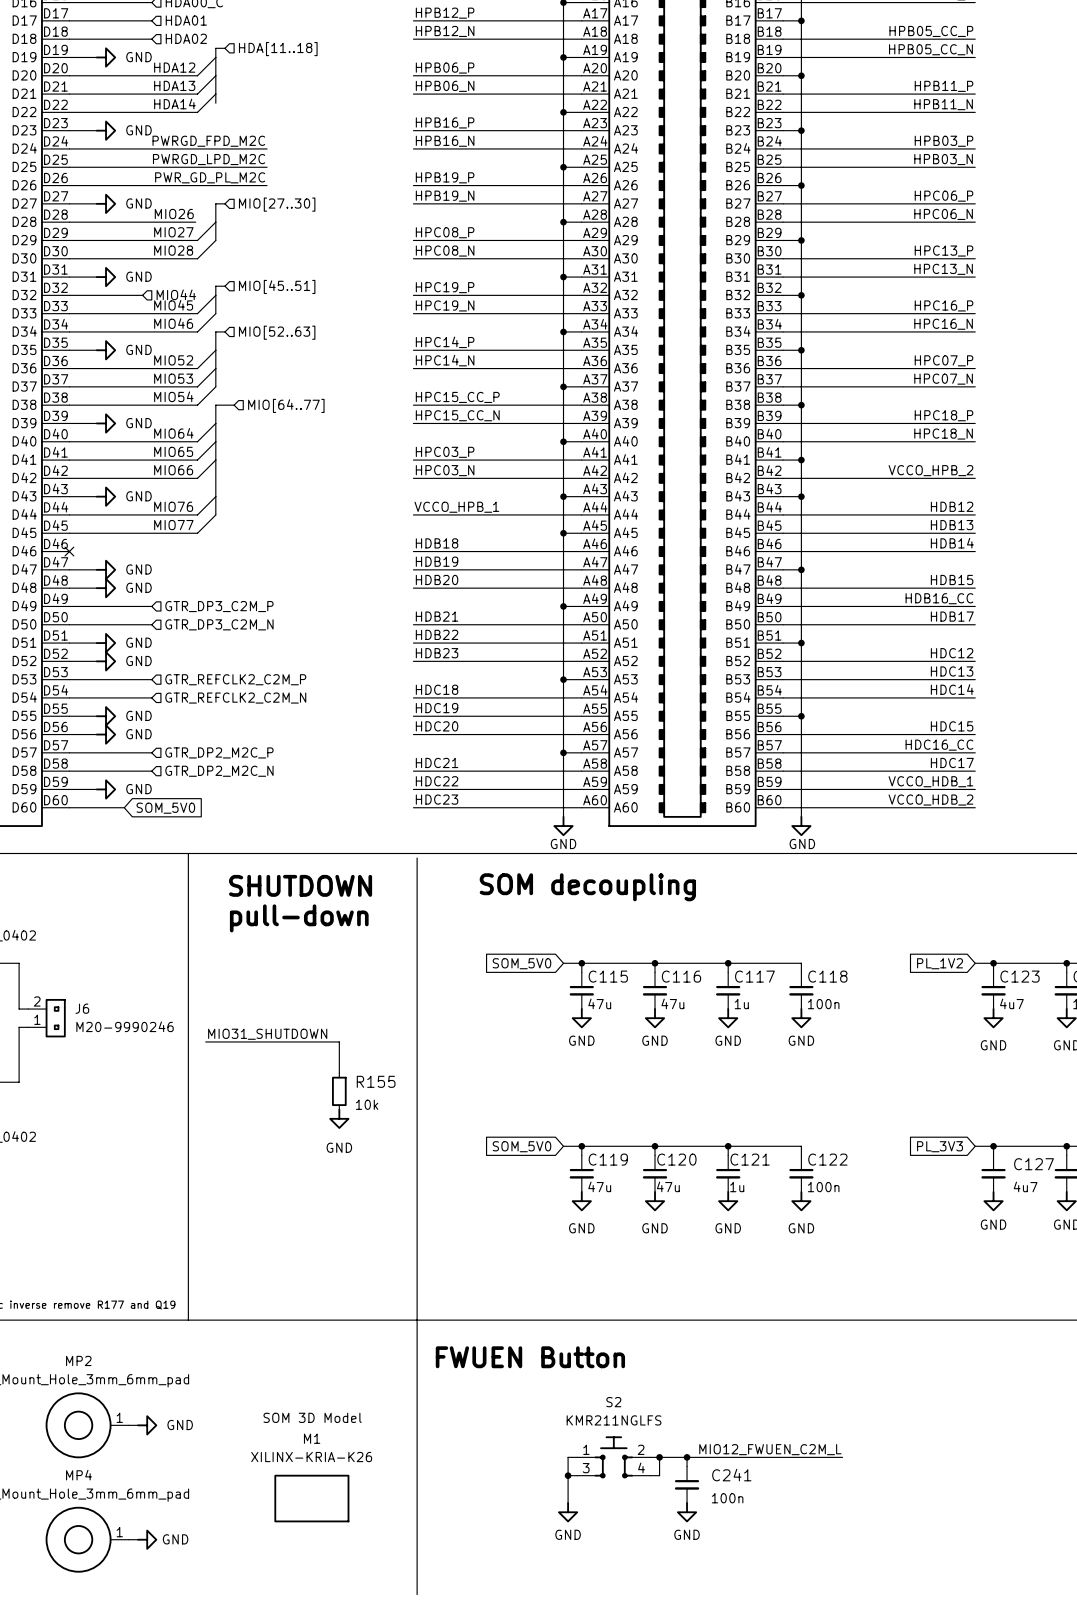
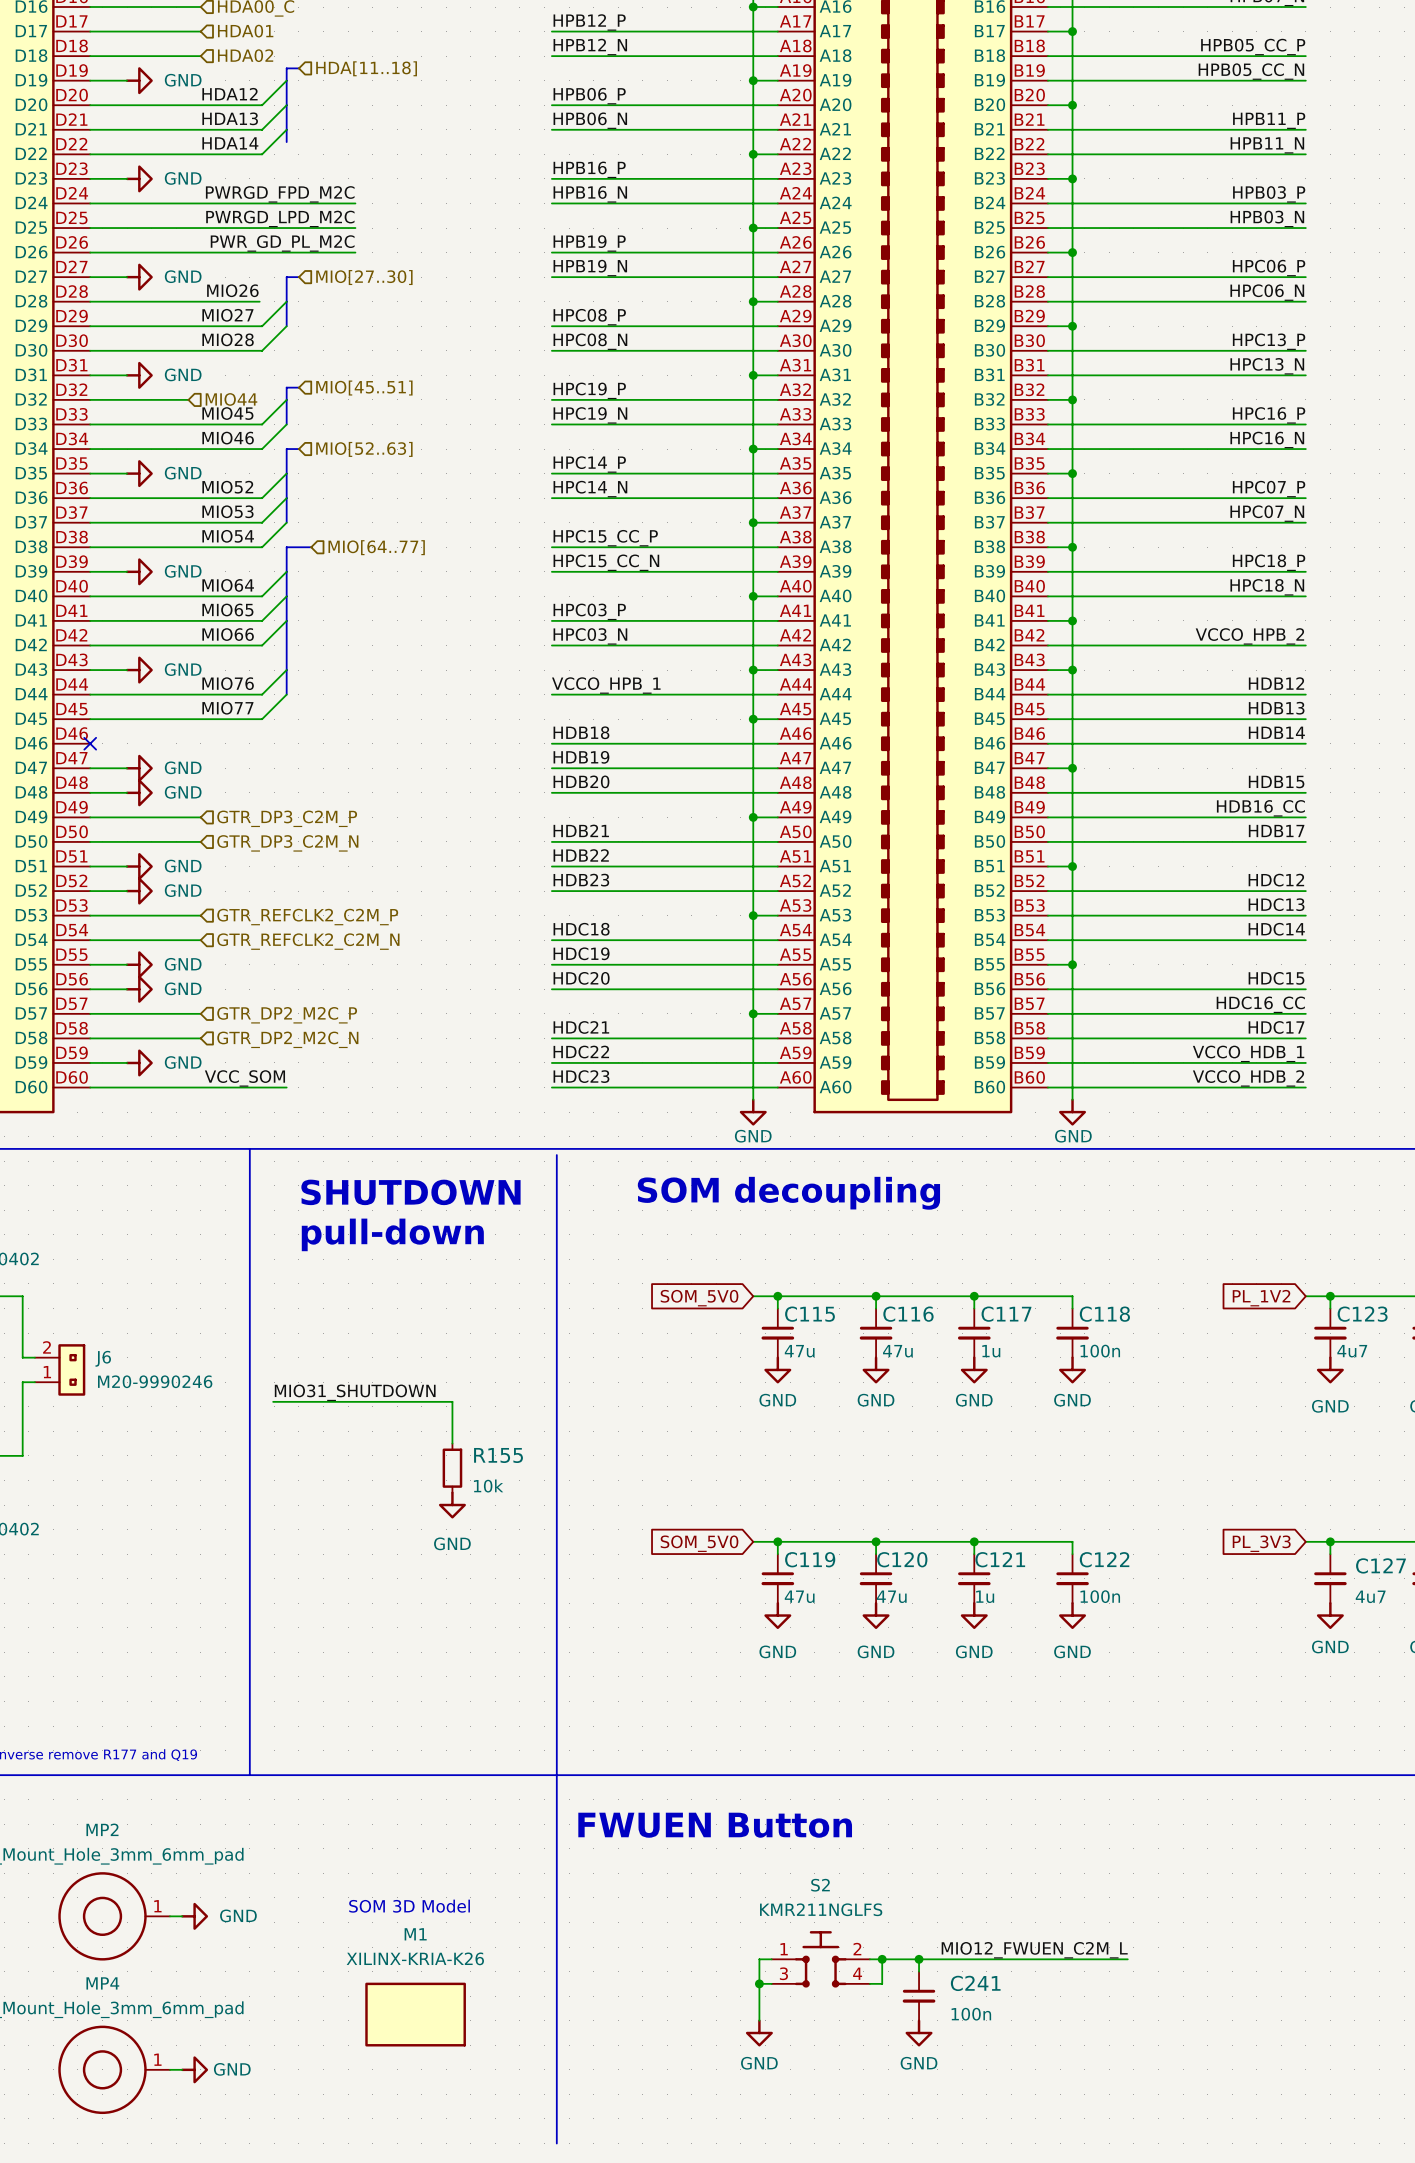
label: none -> VCC_SOM (244, 1078)
wire: none -> (163, 1087) (286, 1087)
global label: SOM_5V0 (165, 808) -> none

